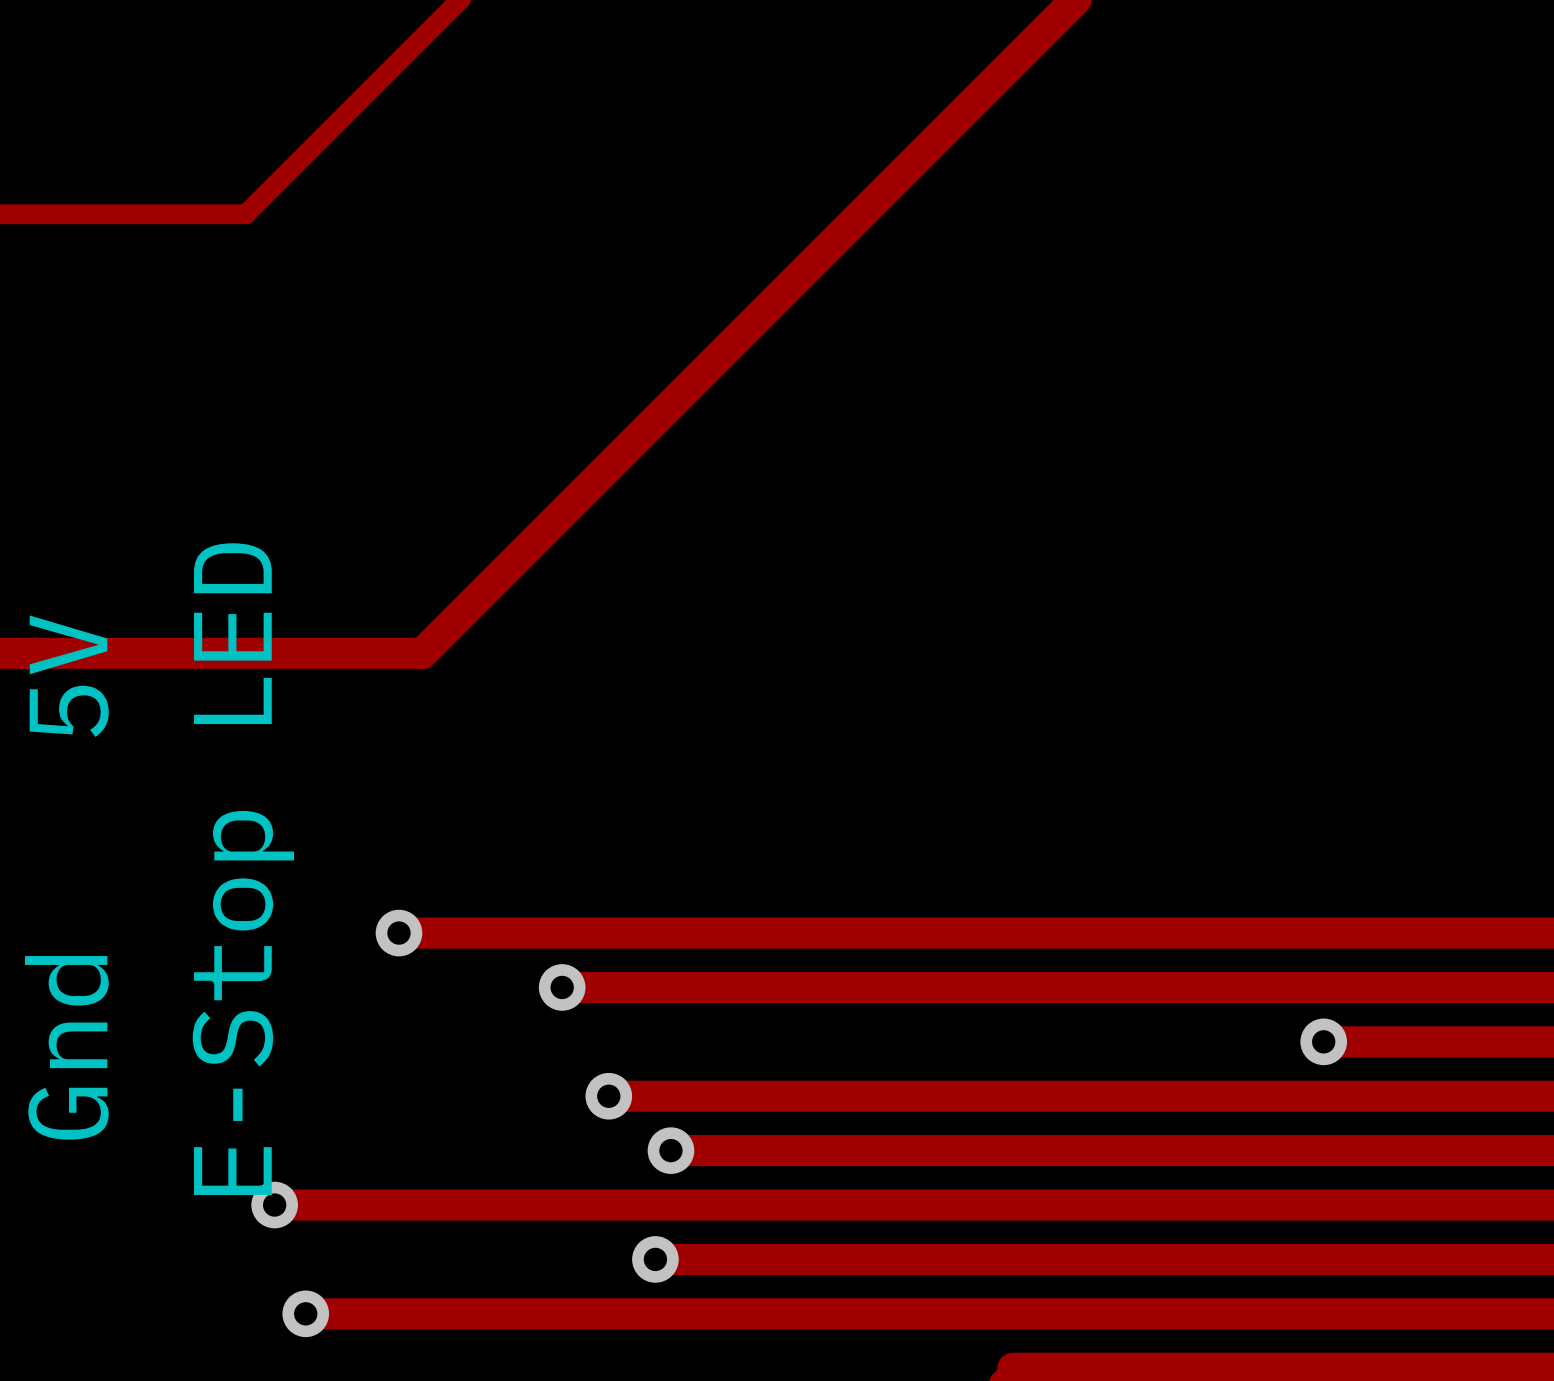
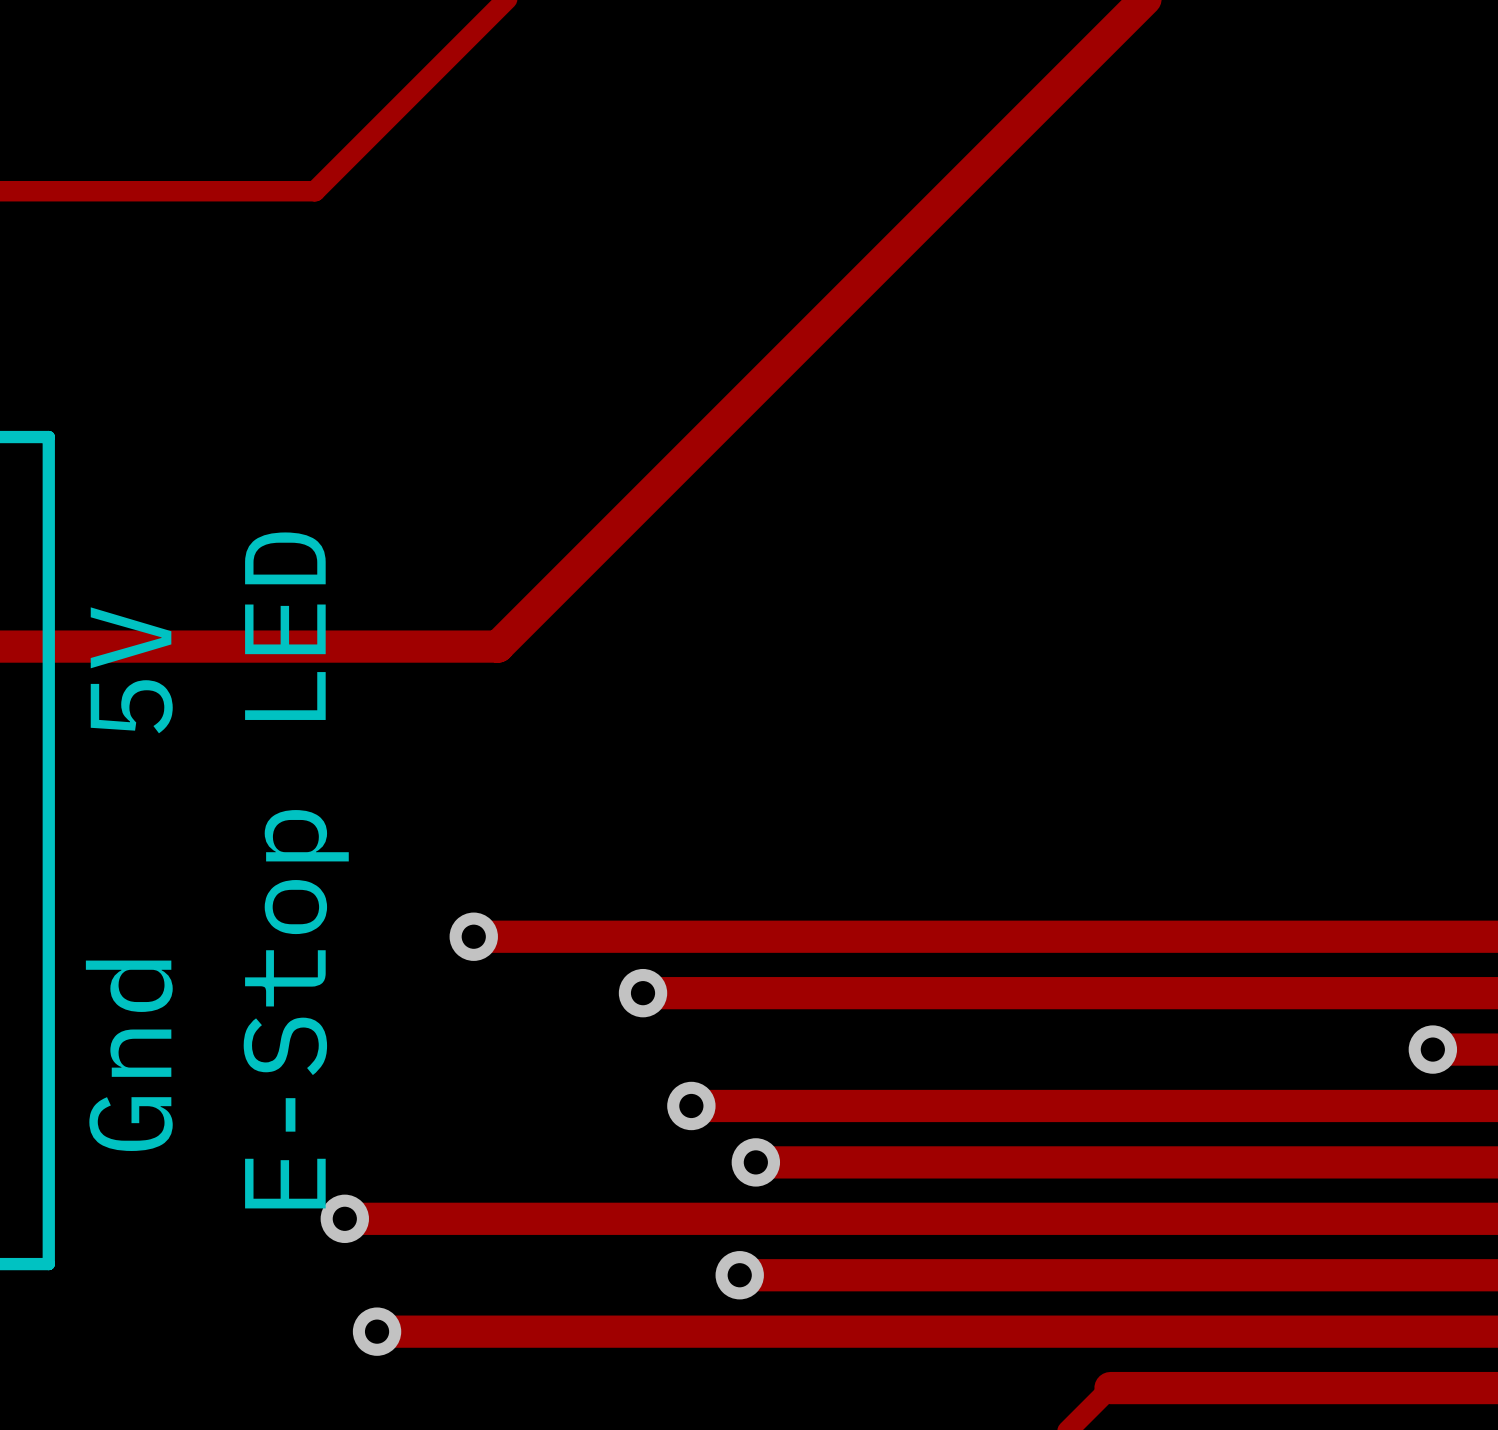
text position: E-Stop LED (243, 869) -> E-Stop LED (296, 870)

